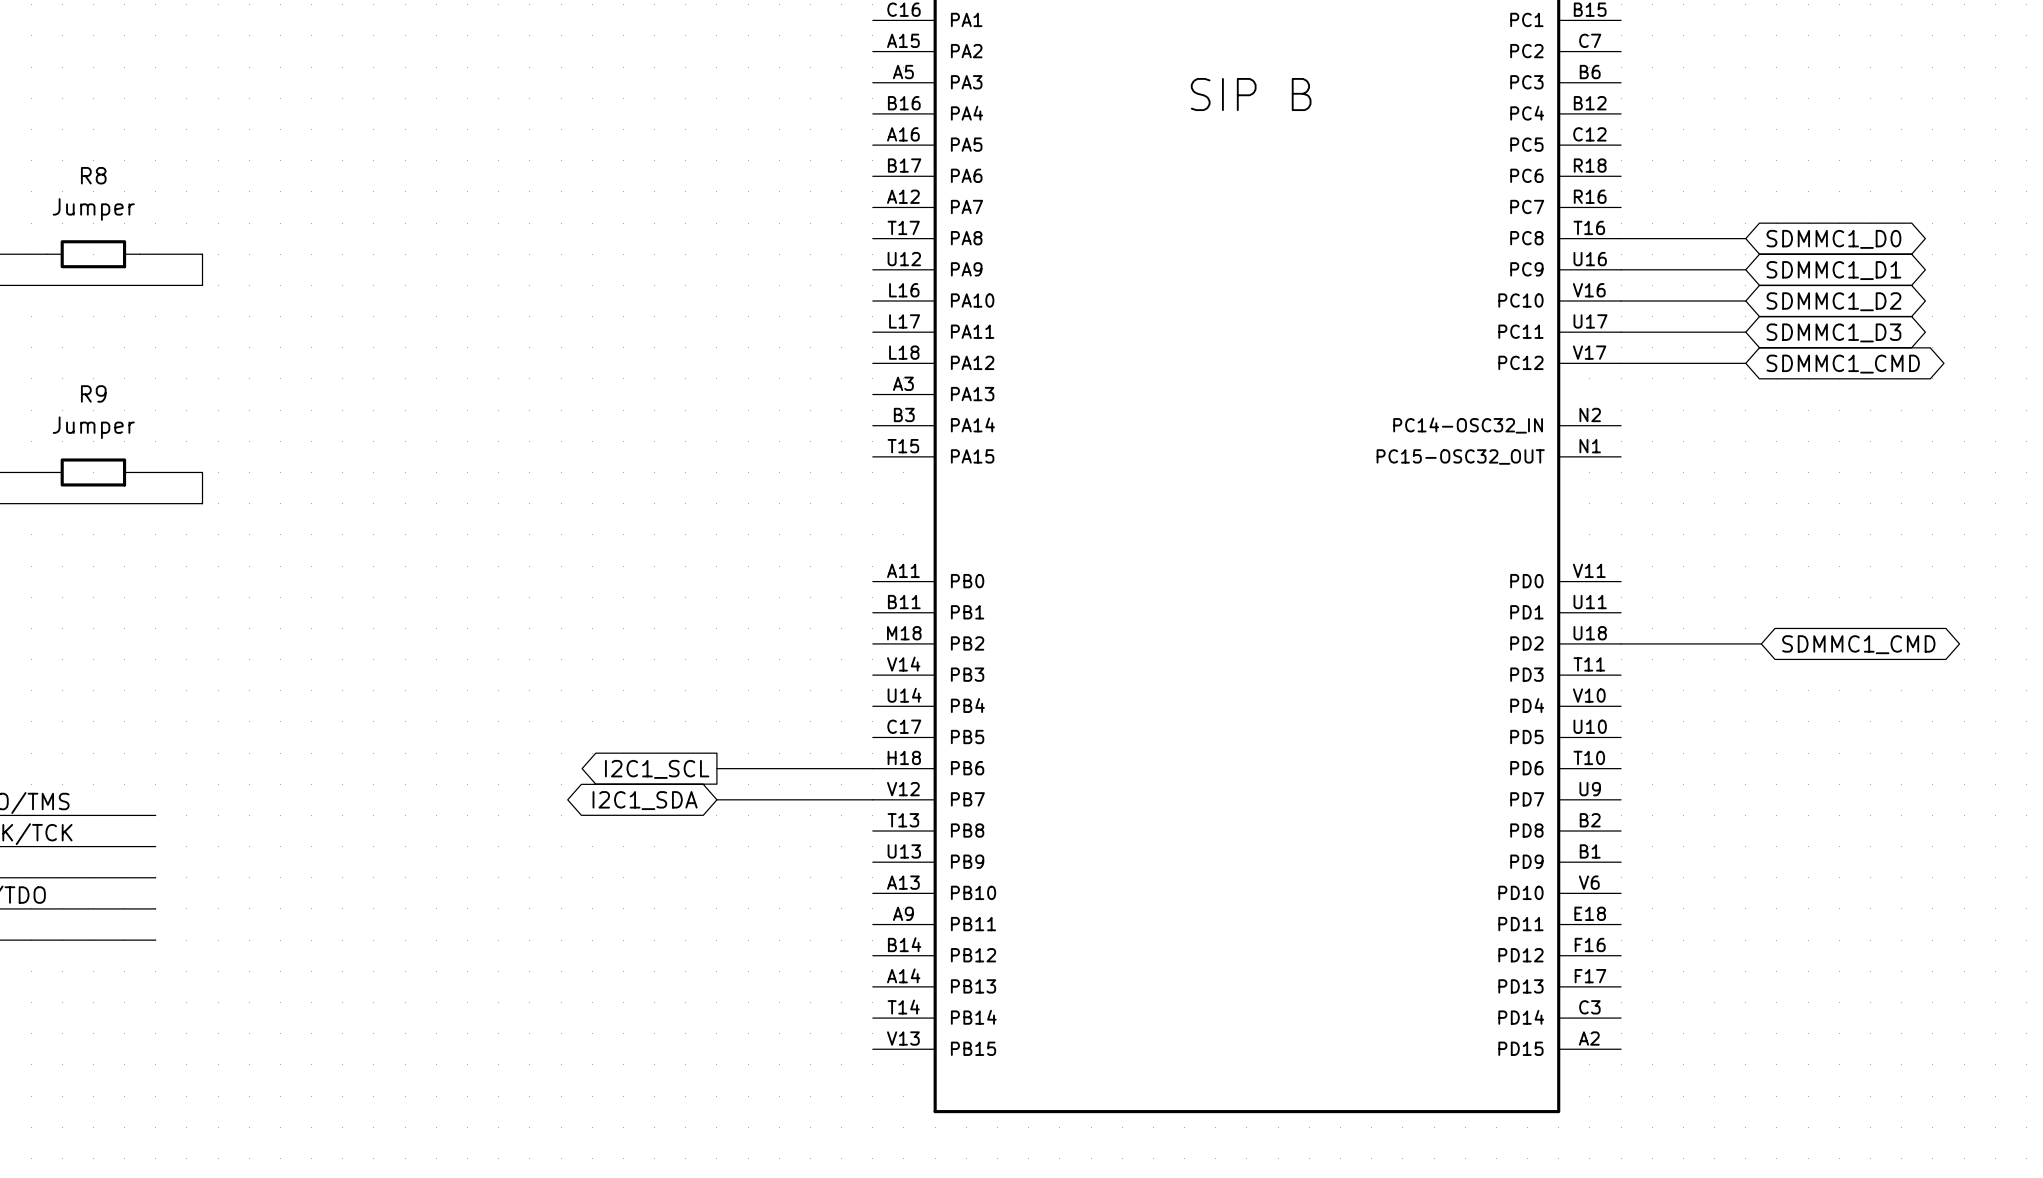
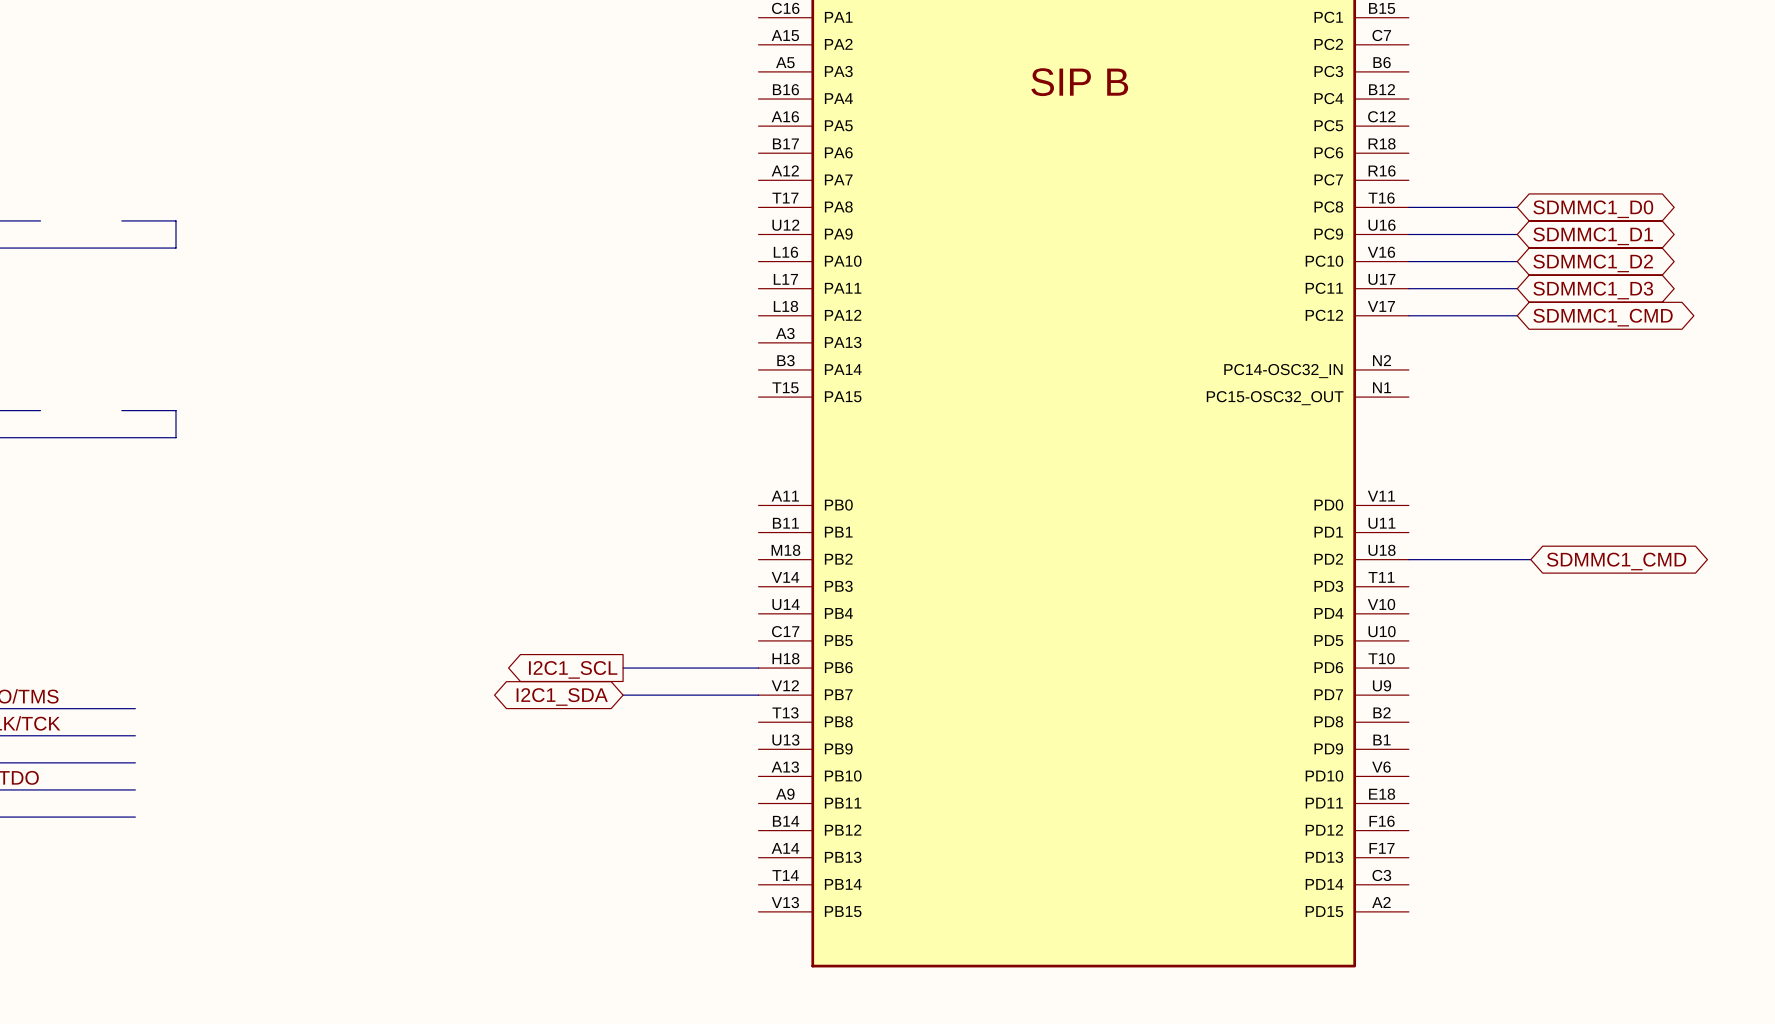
R8: Jumper (93, 254) -> none
R9: Jumper (93, 472) -> none

